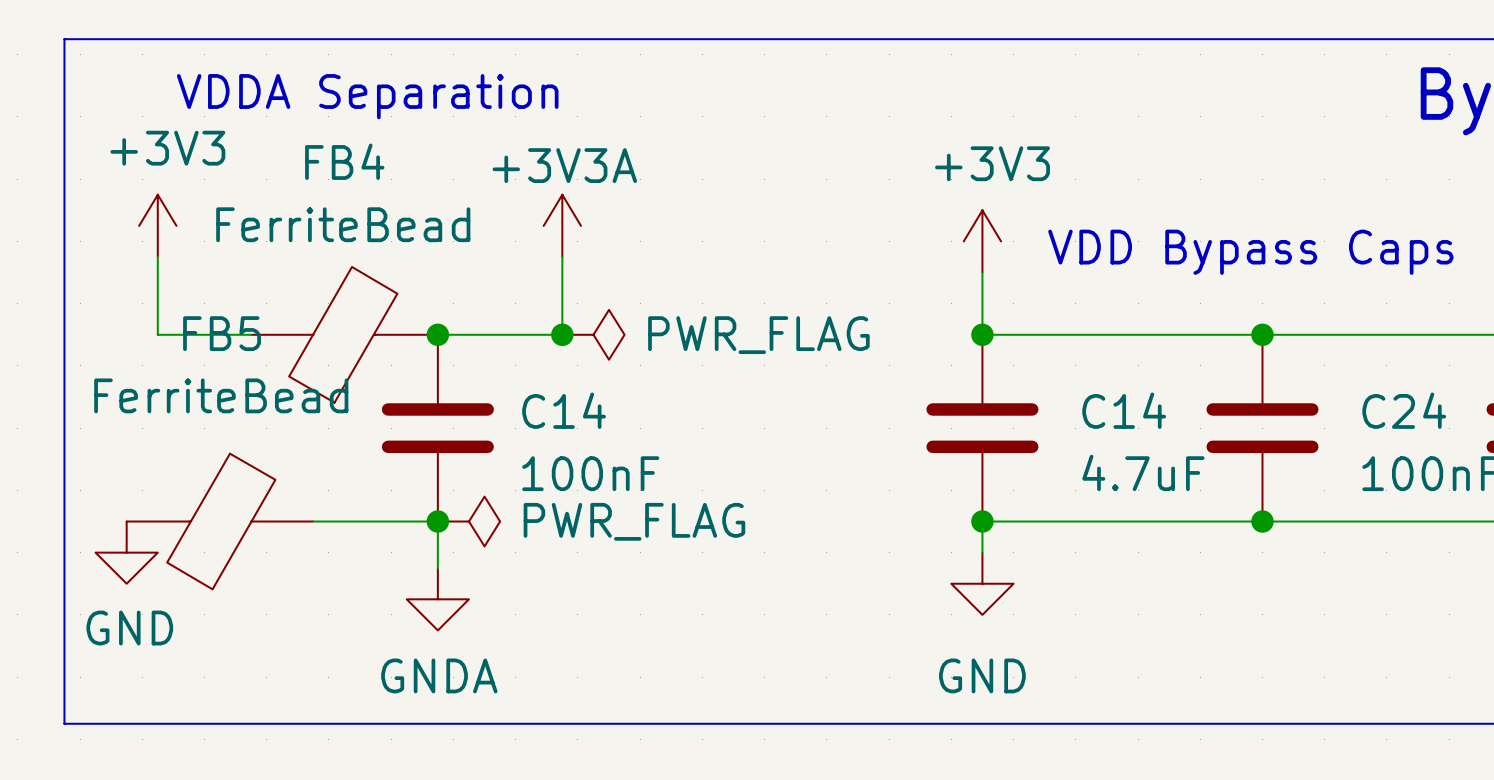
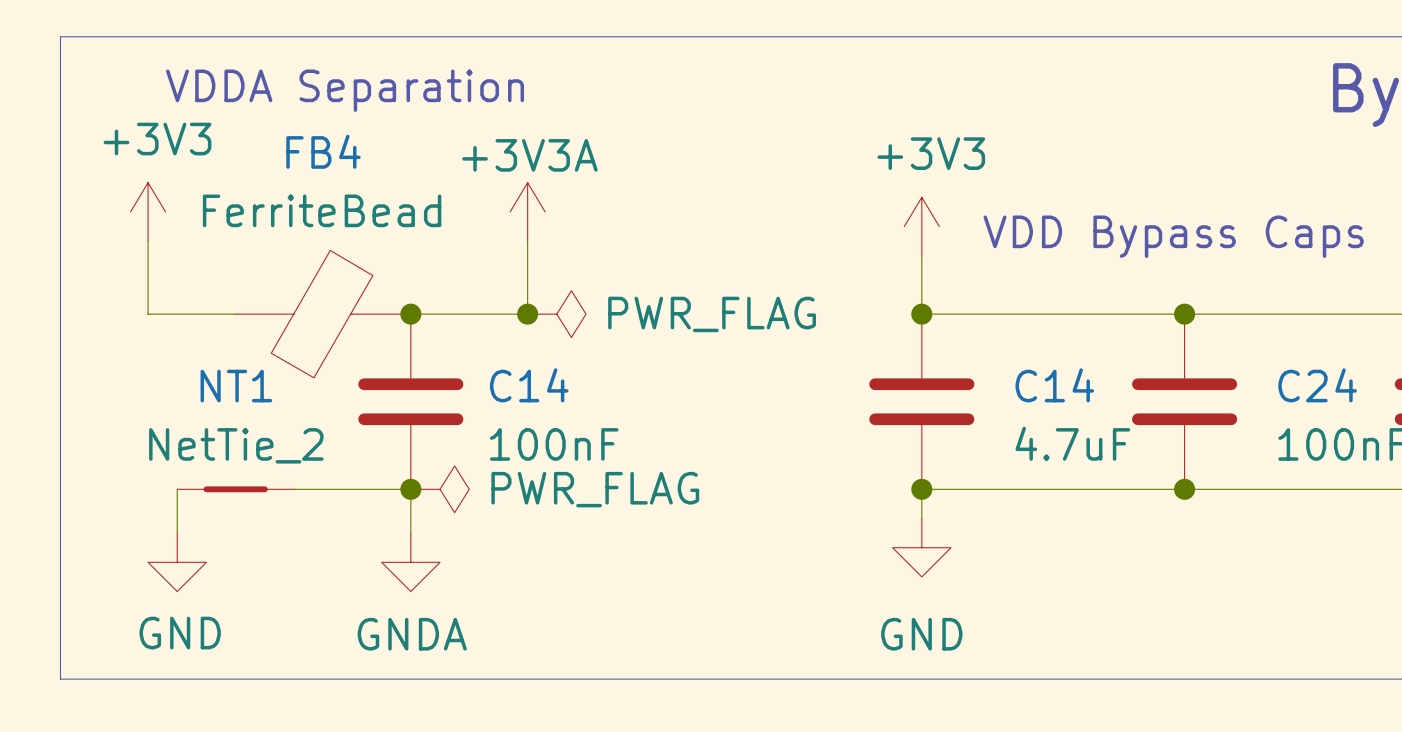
wire: none -> (177, 489) (177, 533)
FB5: FerriteBead (220, 521) -> none
NT1: none -> NetTie_2 (235, 489)
power symbol position: GND (126, 552) -> GND (177, 562)

